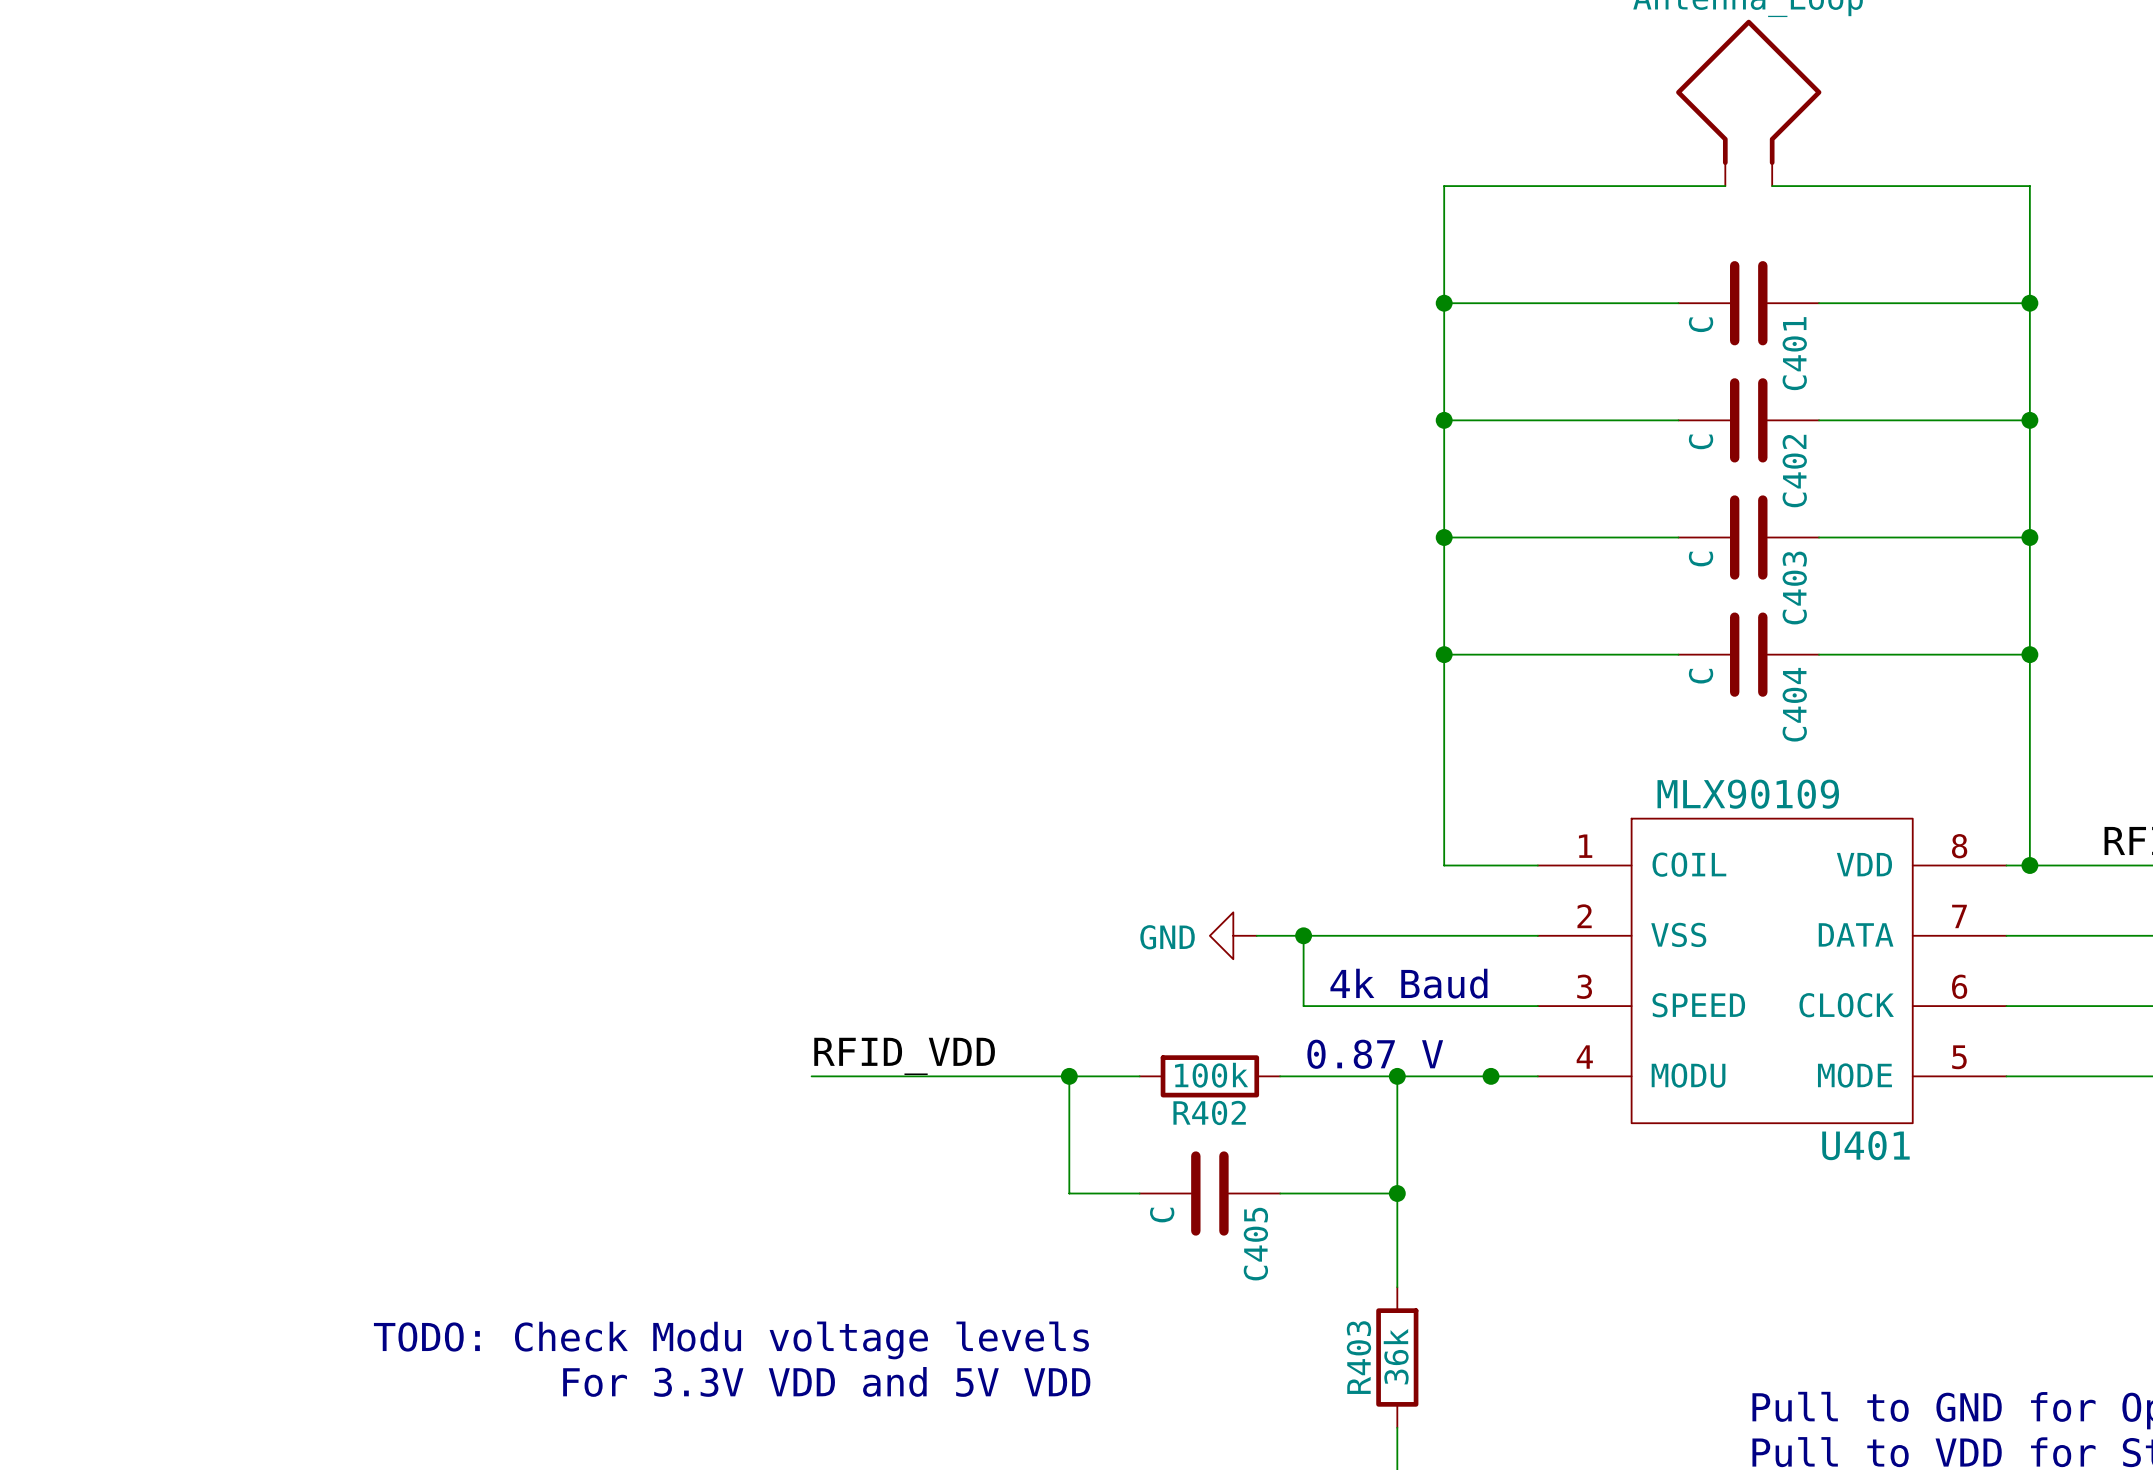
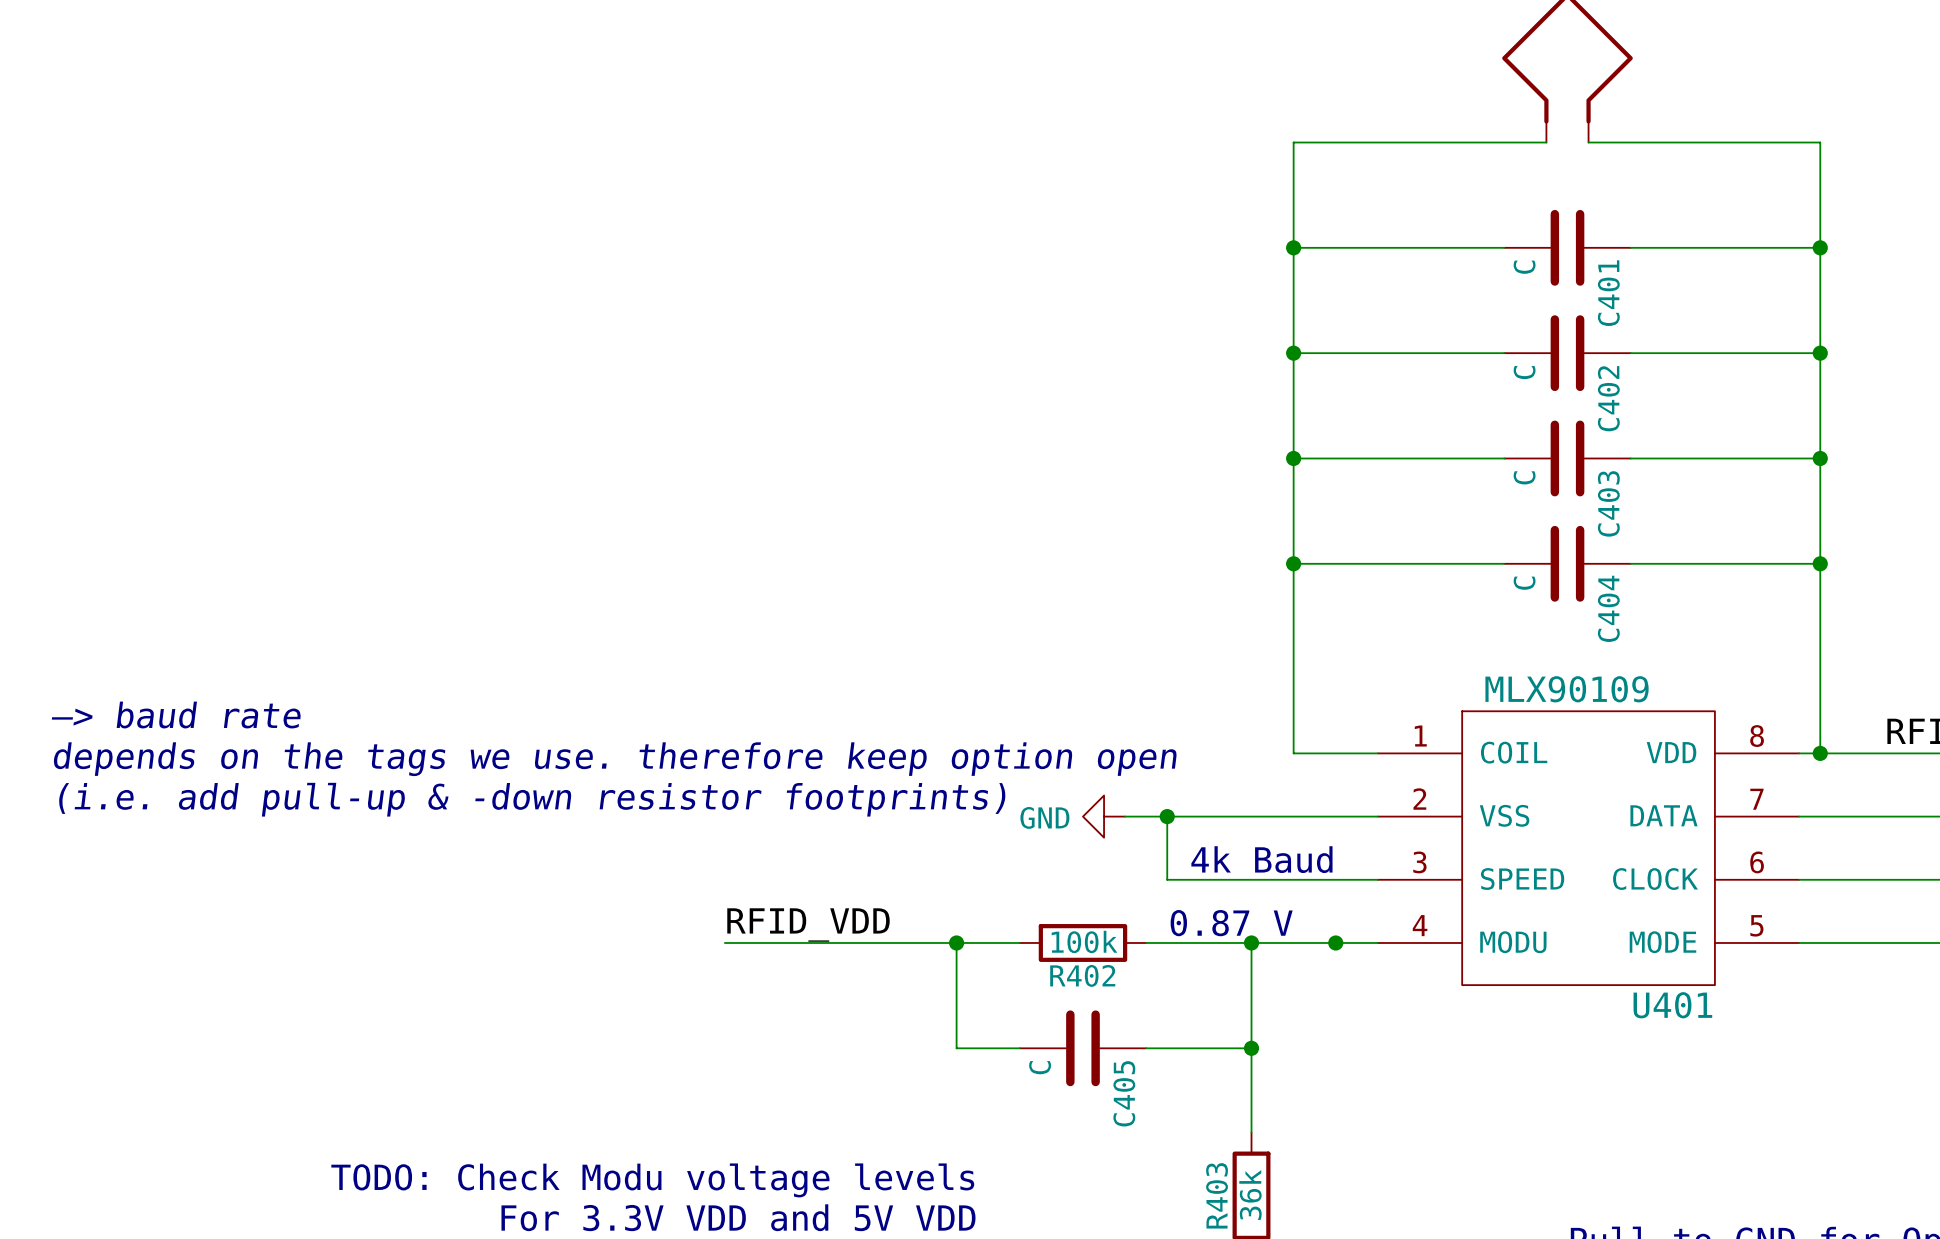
text: none -> —> baud rate (176, 715)
text: none -> depends on the tags we use. therefore keep option open (615, 759)
text: none -> (i.e. add pull-up & -down resistor footprints) (532, 799)

